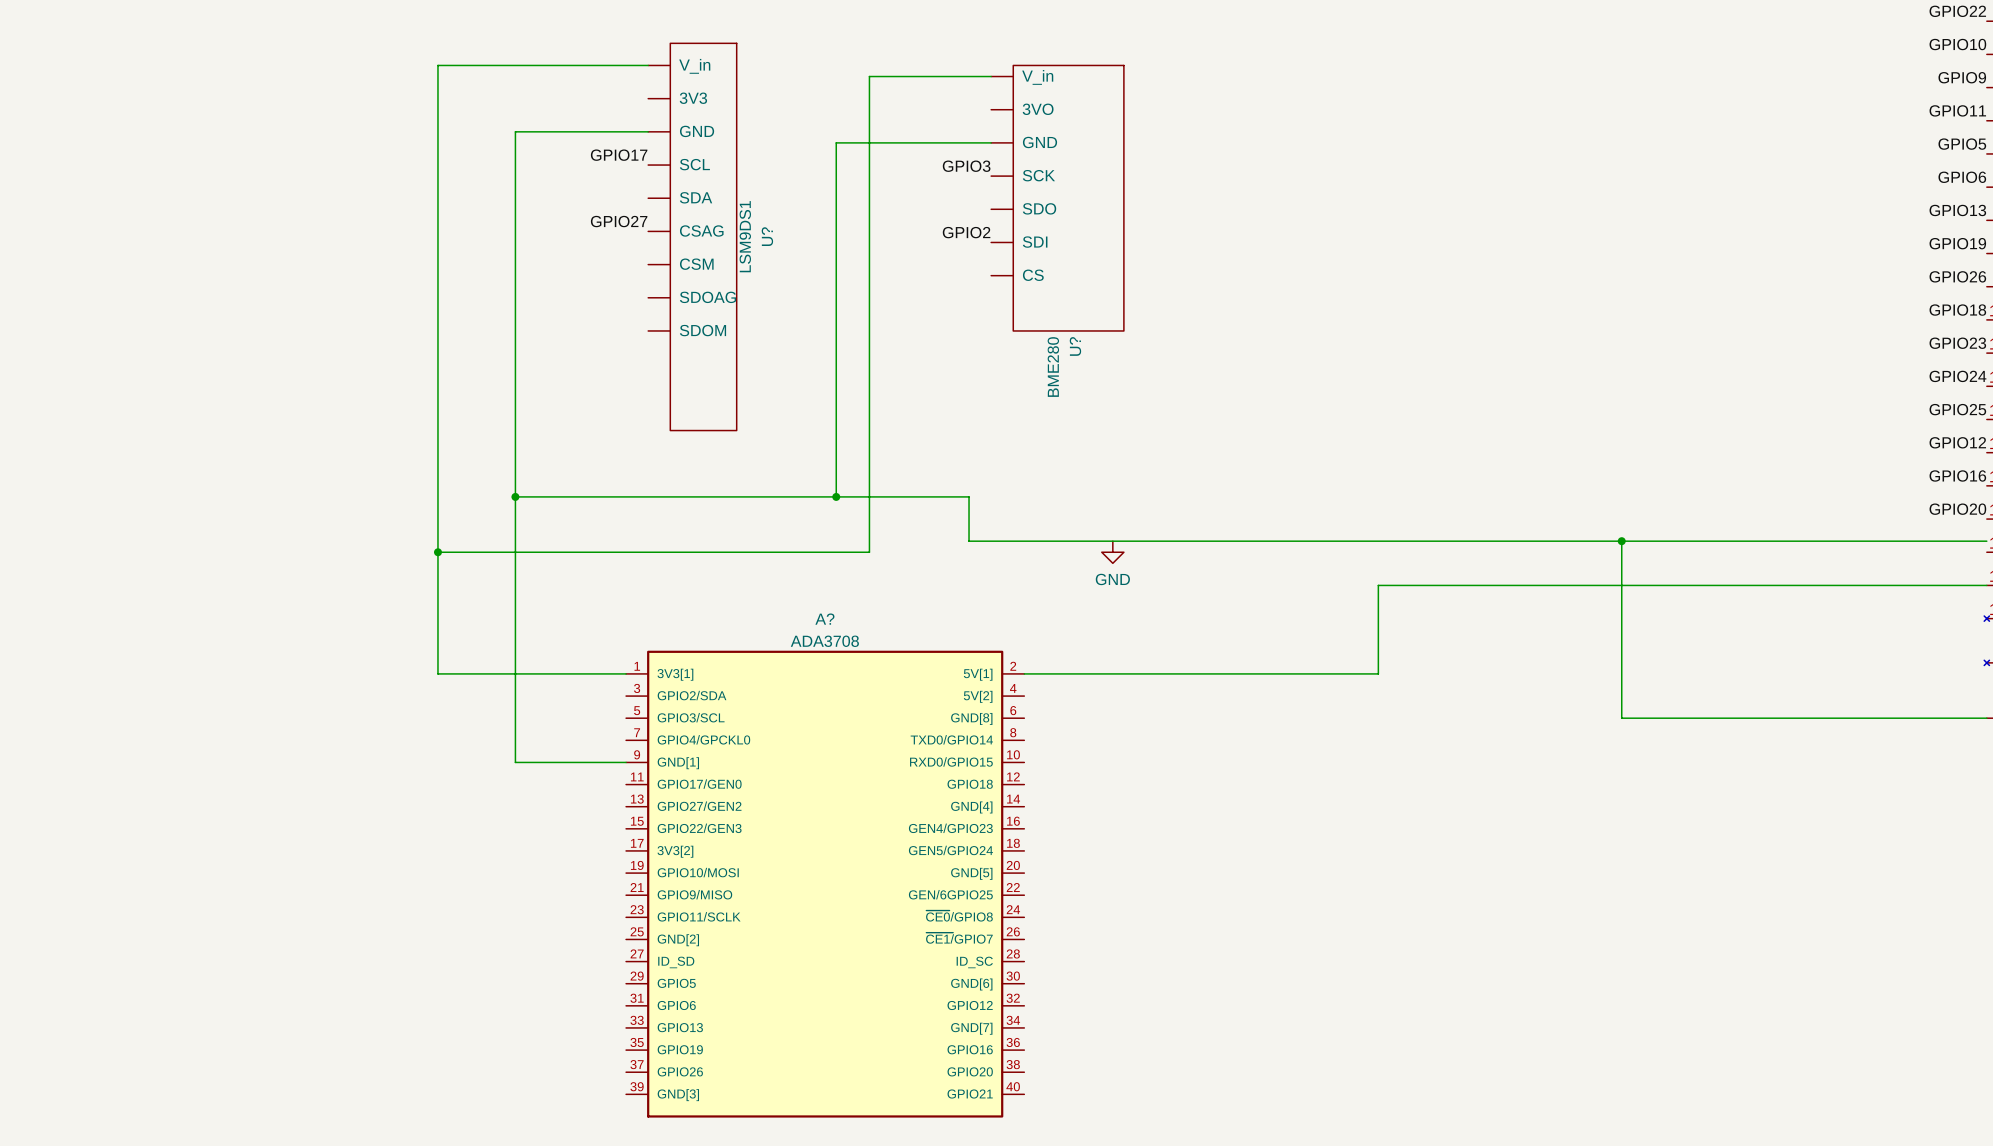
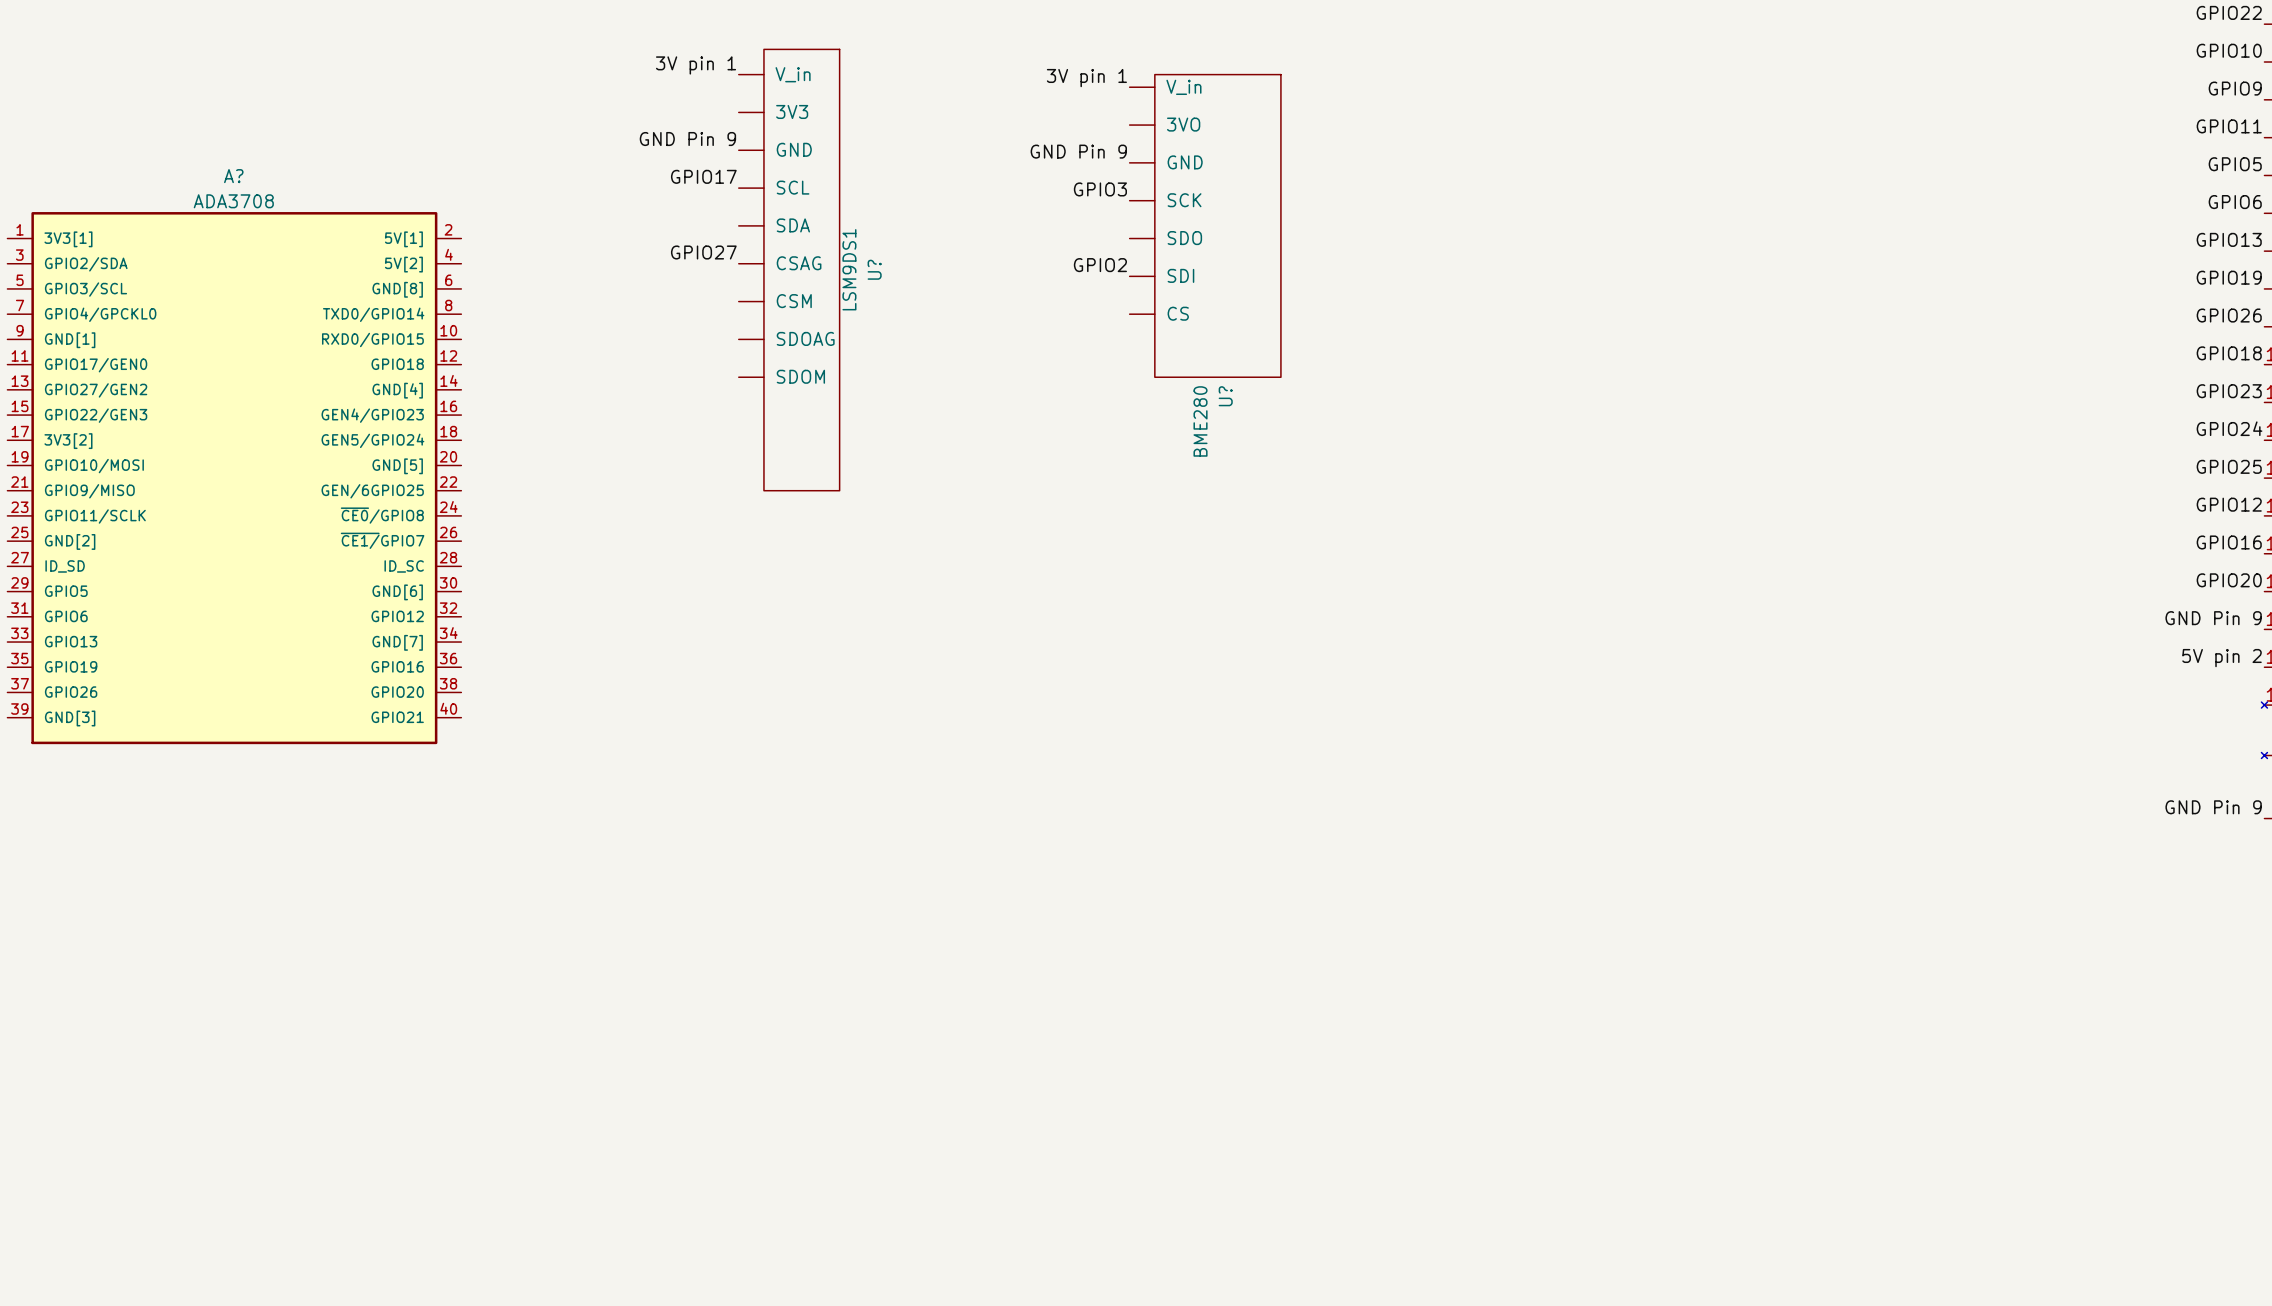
label: none -> 3V pin 1 (696, 65)
wire: (648, 65) (437, 65) (437, 673) (626, 673) -> none
label: none -> 3V pin 1 (1086, 78)
wire: (991, 76) (869, 76) (869, 552) (437, 552) -> none
label: none -> GND Pin 9 (687, 139)
wire: (648, 131) (515, 131) (515, 762) (626, 762) -> none
label: none -> GND Pin 9 (1078, 151)
wire: (991, 142) (836, 142) (836, 496) -> none
A?: none -> ADA3708 (234, 478)
wire: (515, 496) (969, 496) (969, 541) (1986, 541) -> none
junction: (515, 496) -> none
junction: (836, 496) -> none
wire: (1621, 541) (1621, 718) (1986, 718) -> none
junction: (1621, 541) -> none
label: none -> GND Pin 9 (2213, 618)
junction: (437, 552) -> none
power symbol: GND (1112, 552) -> none
label: none -> 5V pin 2 (2222, 658)
wire: (1986, 585) (1378, 585) (1378, 673) (1024, 673) -> none
label: none -> GND Pin 9 (2213, 807)
A?: ADA3708 (825, 884) -> none

